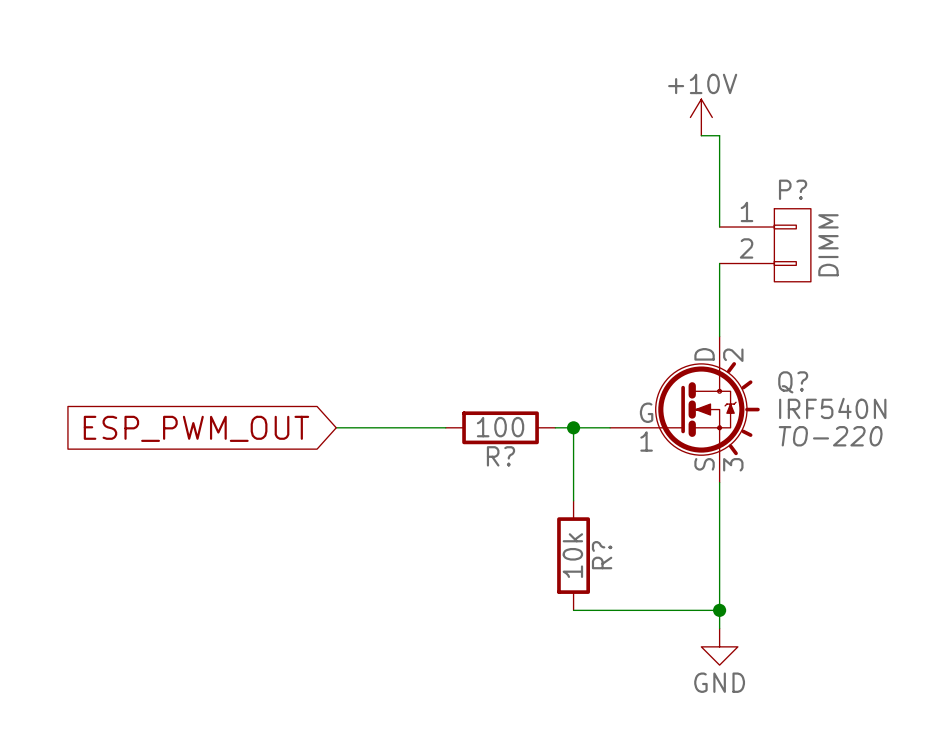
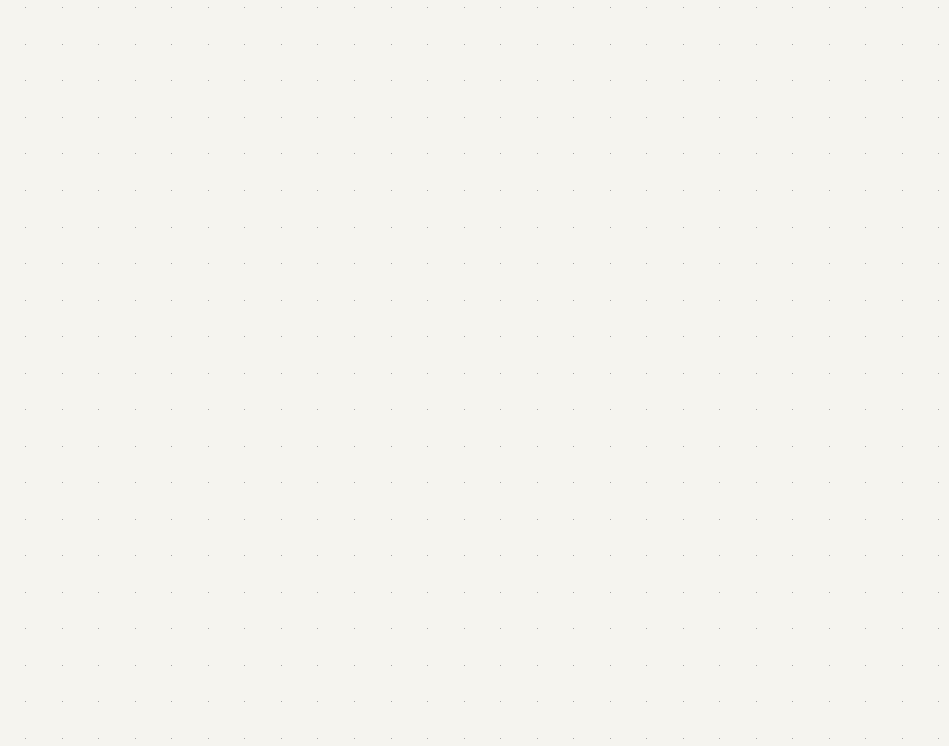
power symbol: +10V (701, 117) -> none
wire: (701, 135) (719, 135) (719, 227) -> none
P?: DIMM (765, 245) -> none
wire: (719, 263) (719, 336) -> none
Q?: IRF540N (684, 409) -> none
wire: (336, 427) (445, 427) -> none
R?: 100 (500, 427) -> none
wire: (555, 427) (610, 427) -> none
wire: (573, 427) (573, 500) -> none
junction: (573, 427) -> none
global label: ESP_PWM_OUT (196, 428) -> none
wire: (719, 482) (719, 628) -> none
R?: 10k (573, 555) -> none
wire: (573, 610) (719, 610) -> none
junction: (719, 610) -> none
power symbol: GND (719, 646) -> none

